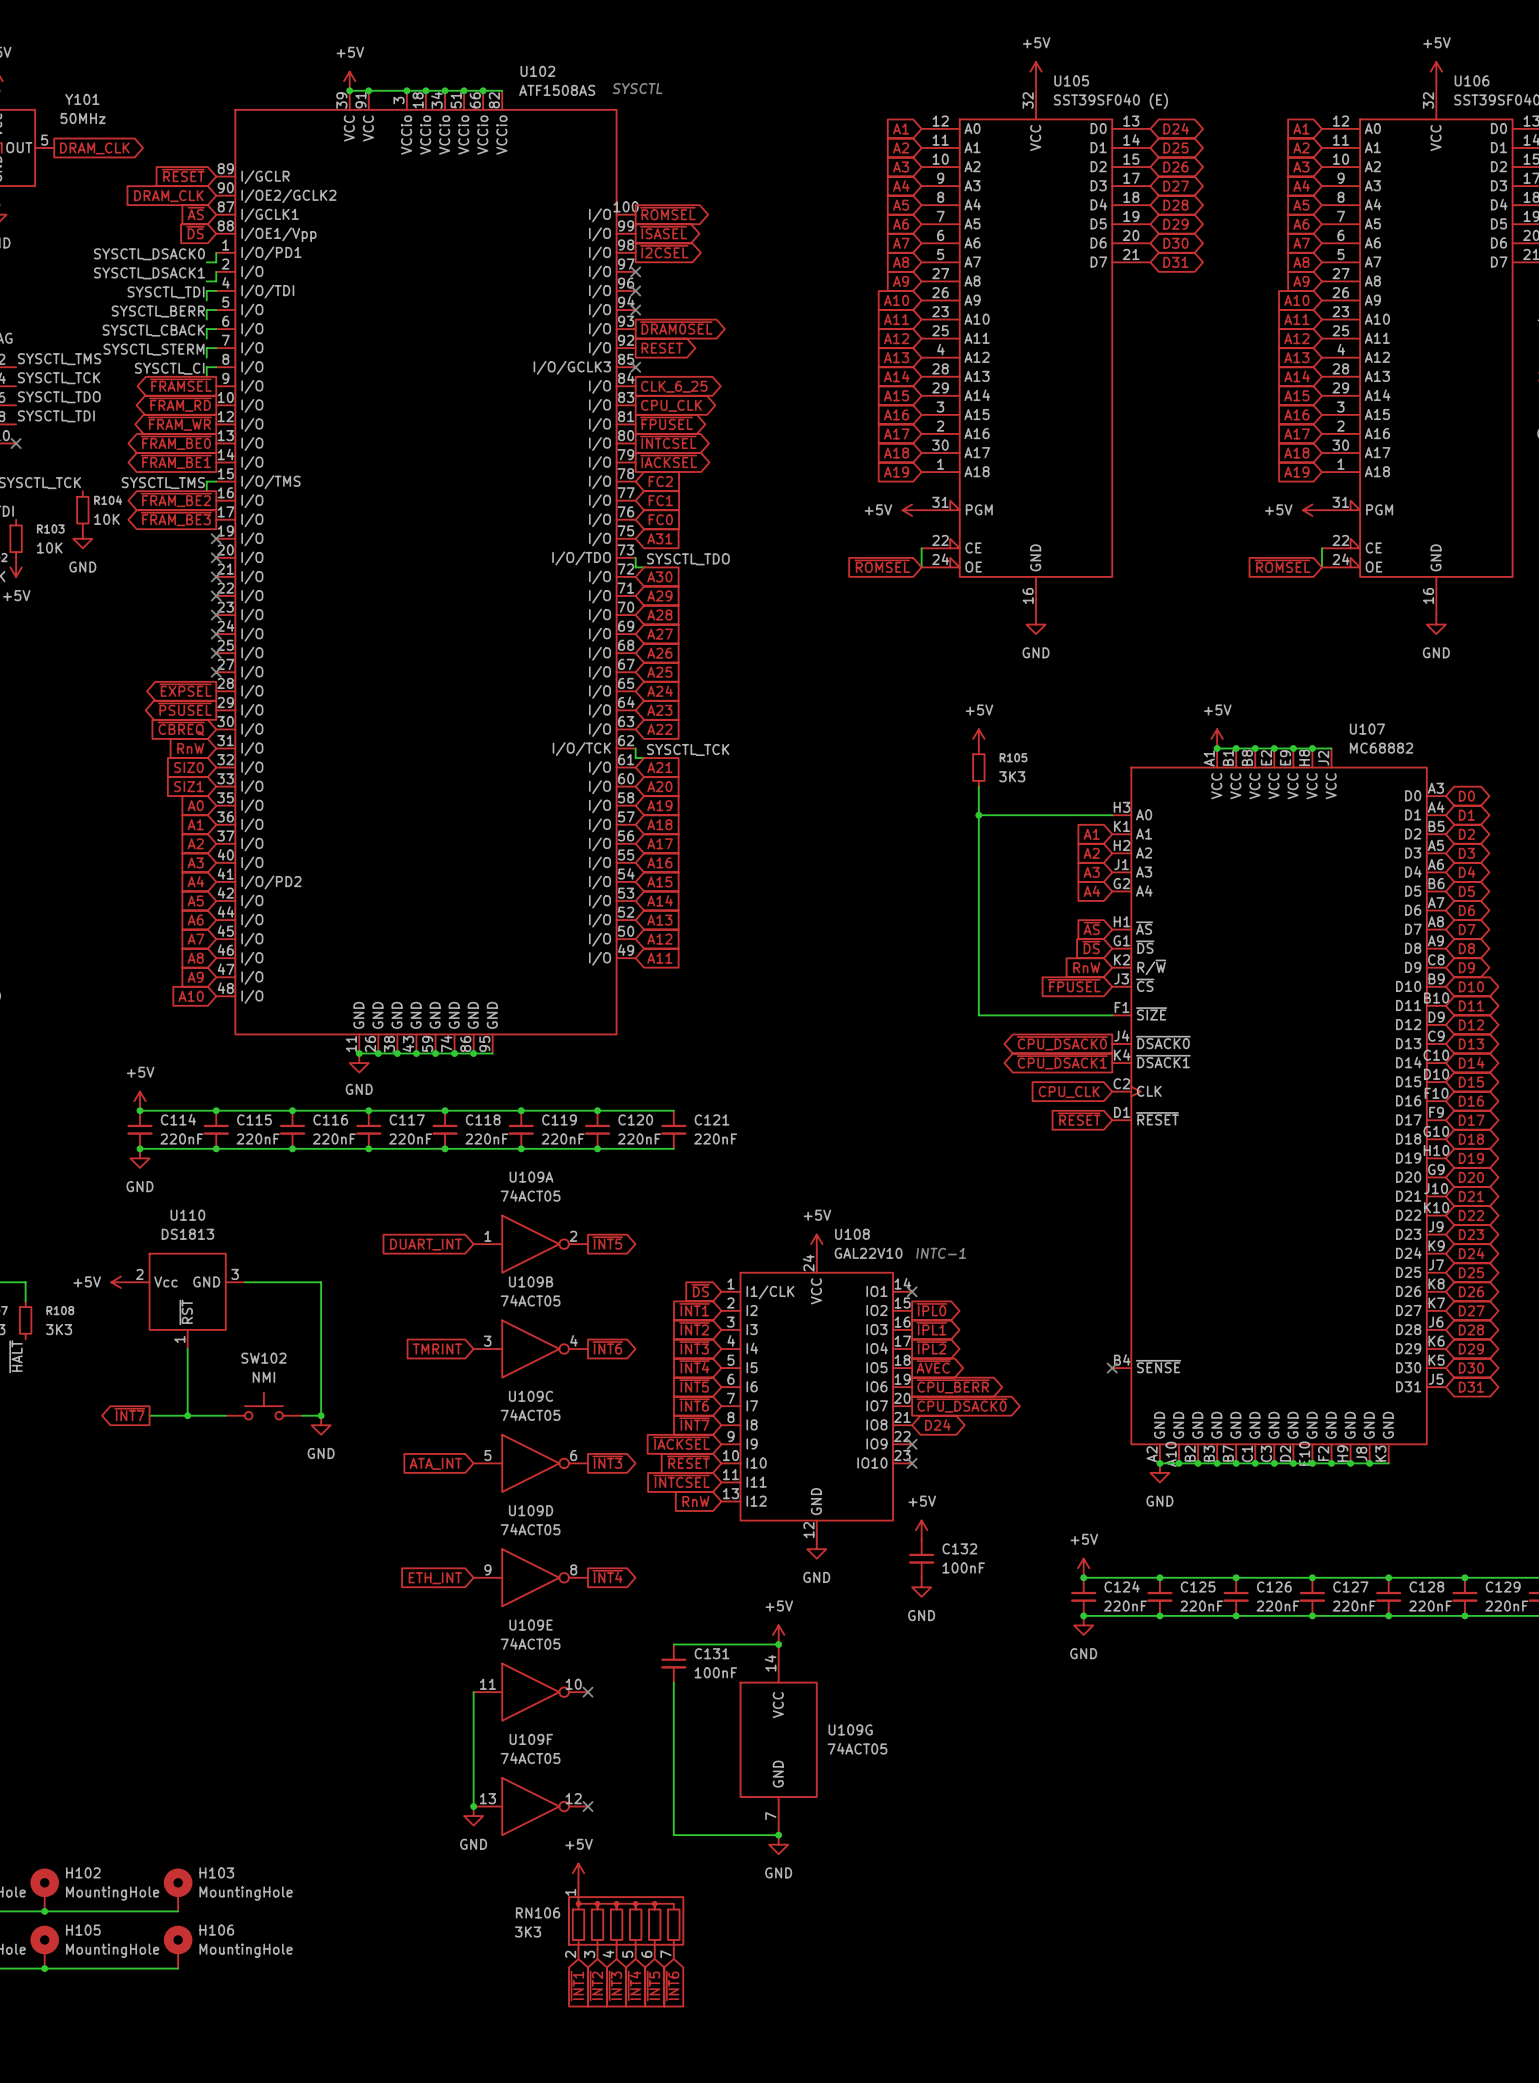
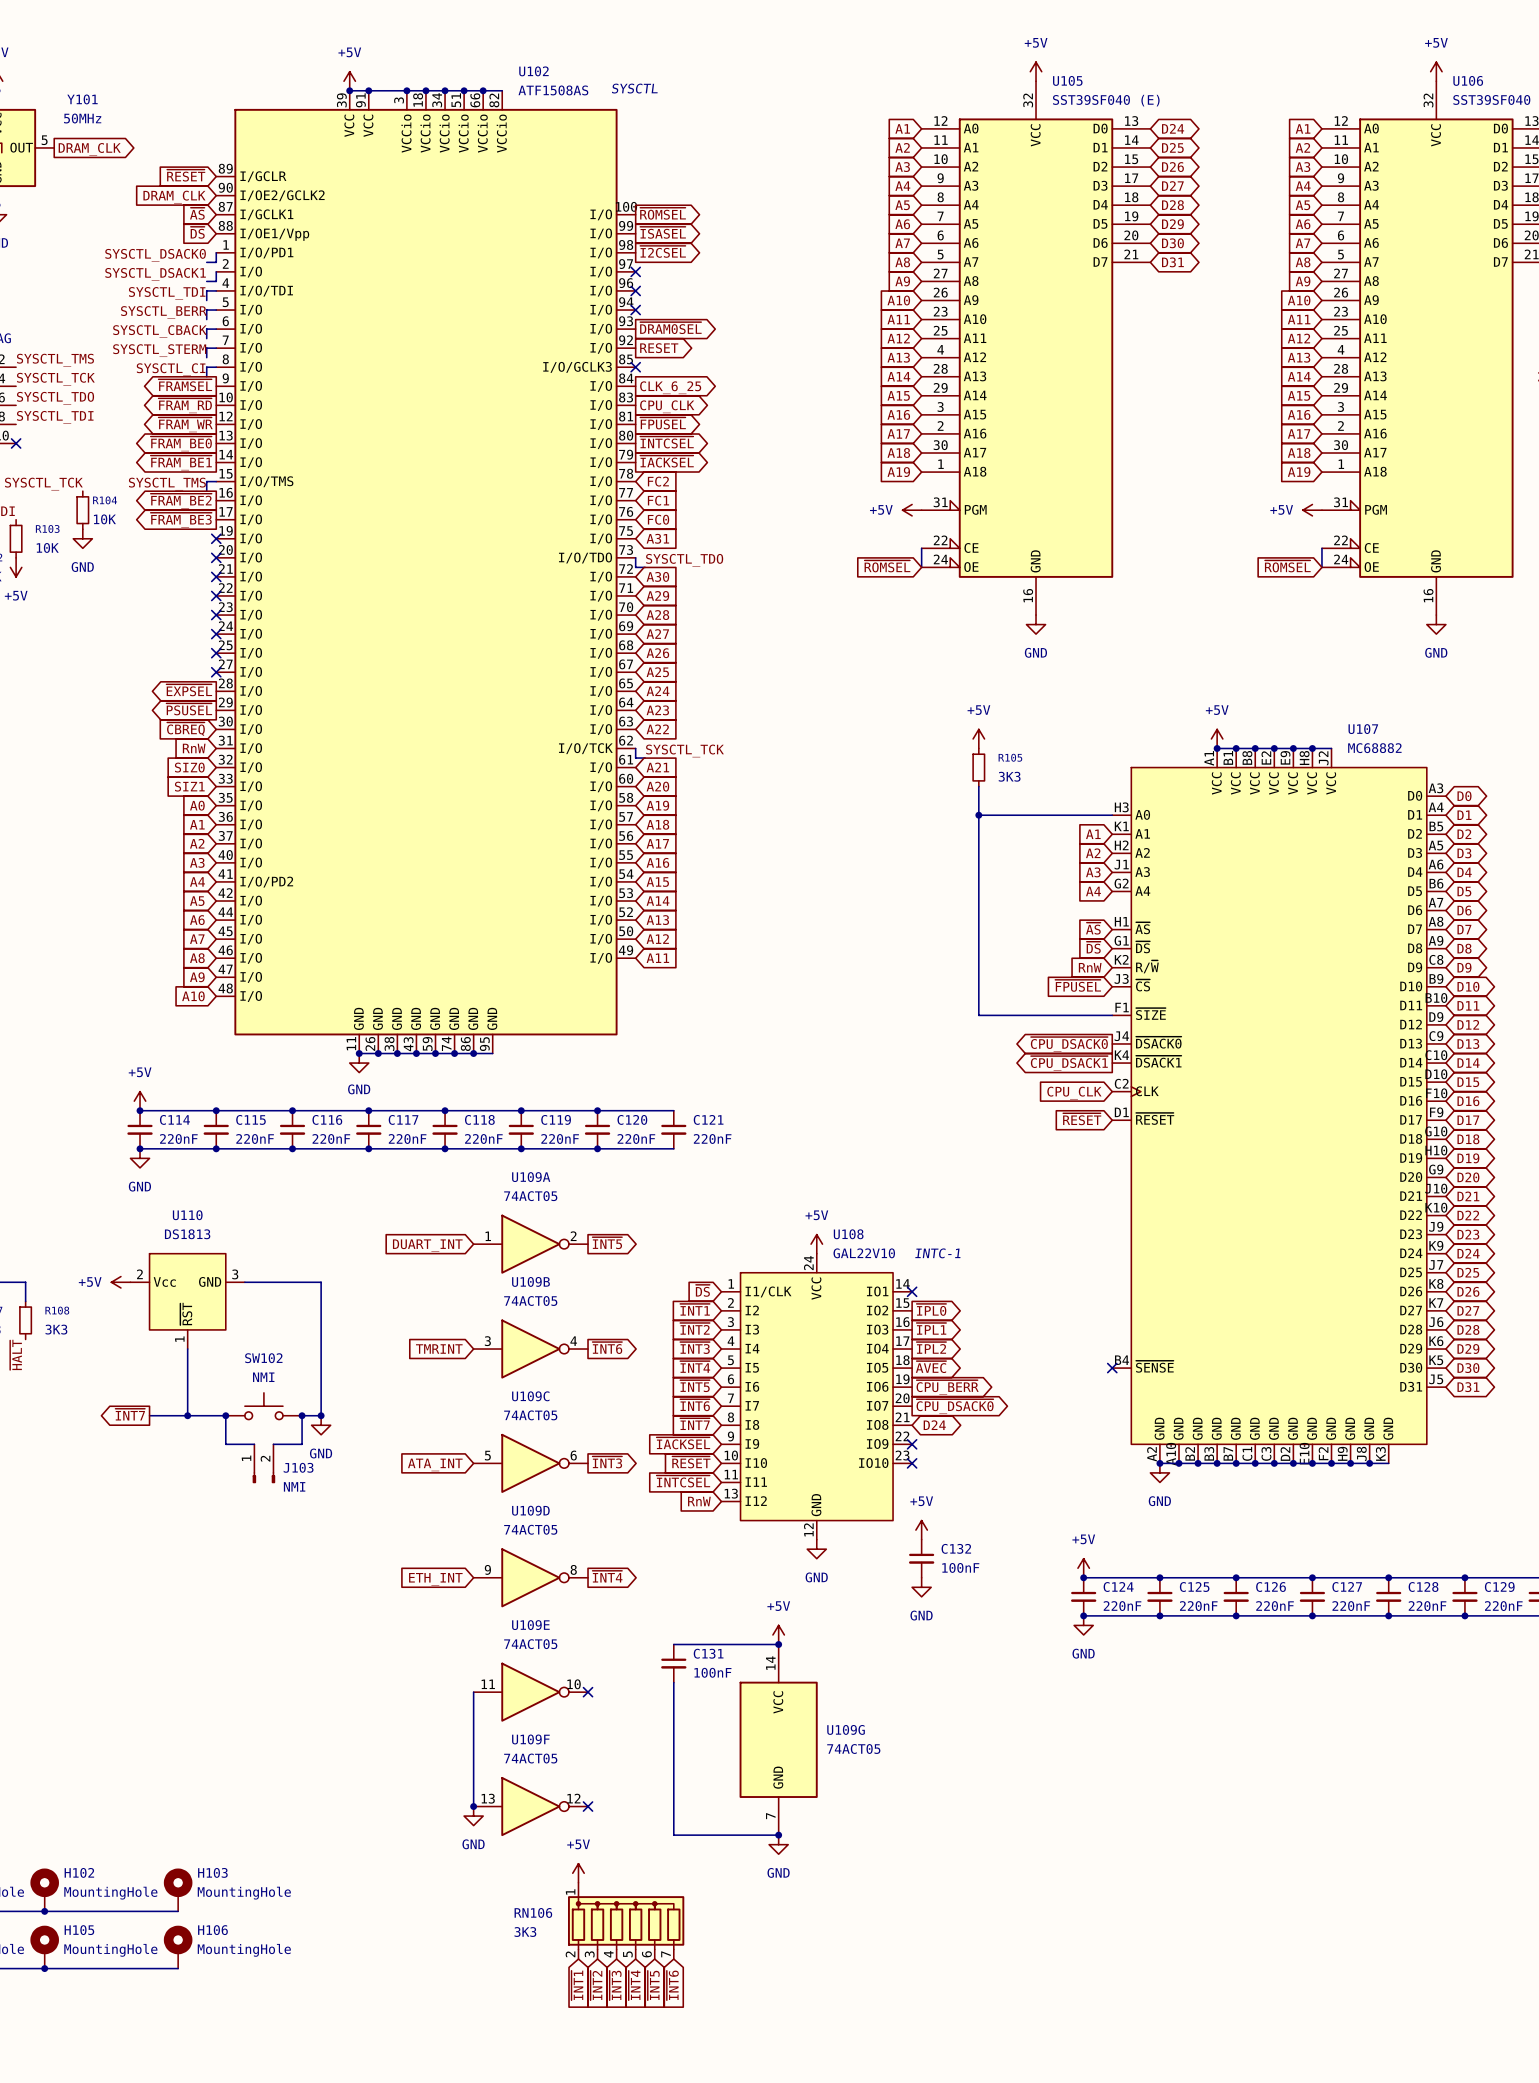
wire: none -> (225, 1415) (225, 1444) (254, 1444)
junction: none -> (225, 1415)
wire: none -> (302, 1415) (302, 1444) (273, 1444)
junction: none -> (302, 1415)
J103: none -> NMI (263, 1463)

